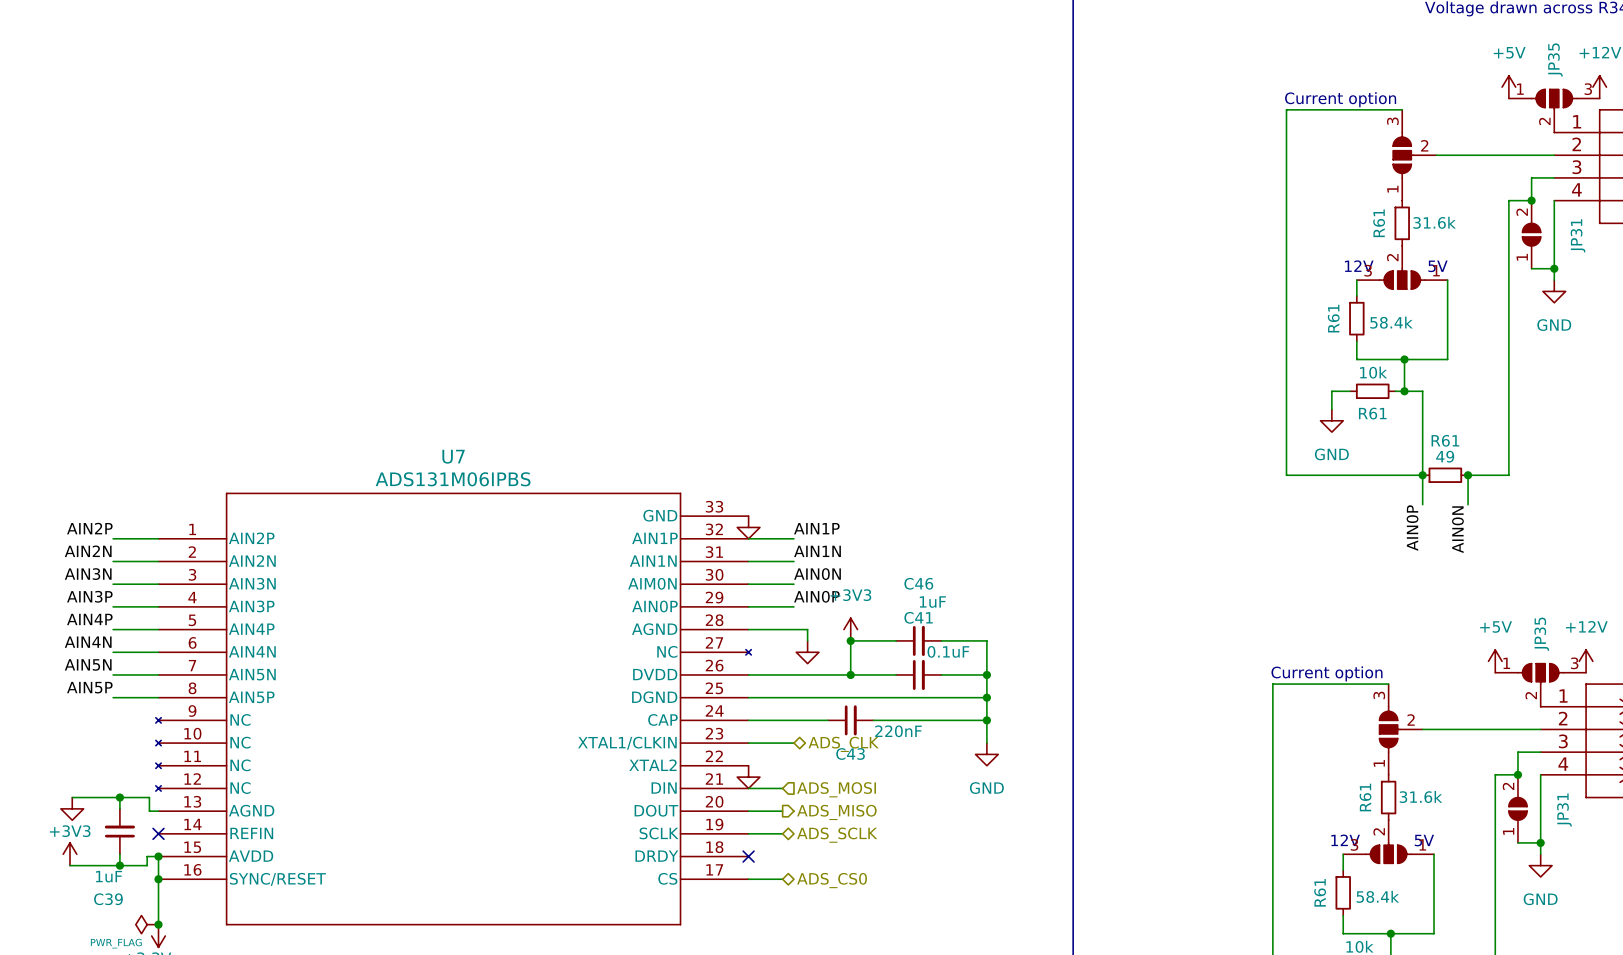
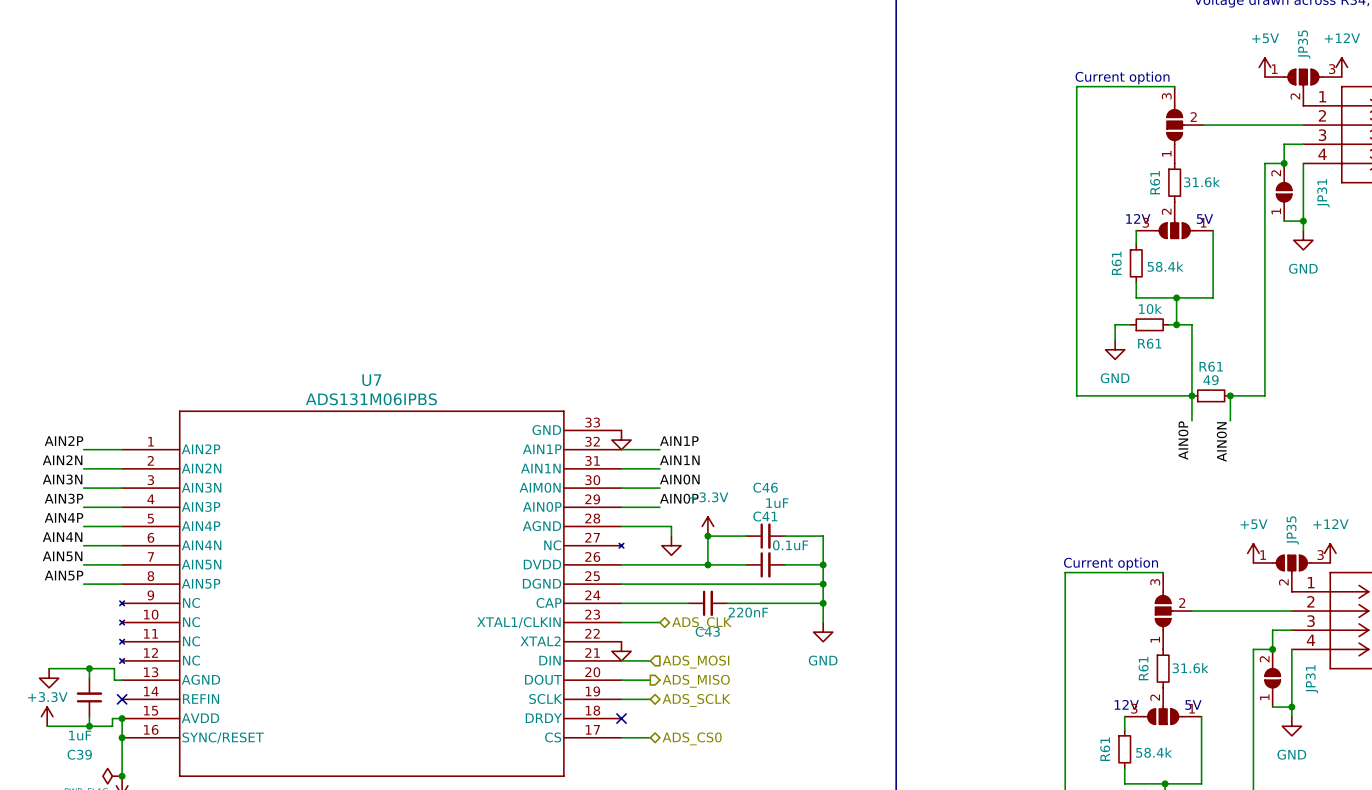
power symbol: +3V3 (850, 629) -> +3.3V (707, 526)
power symbol: +3V3 (69, 854) -> +3.3V (47, 716)

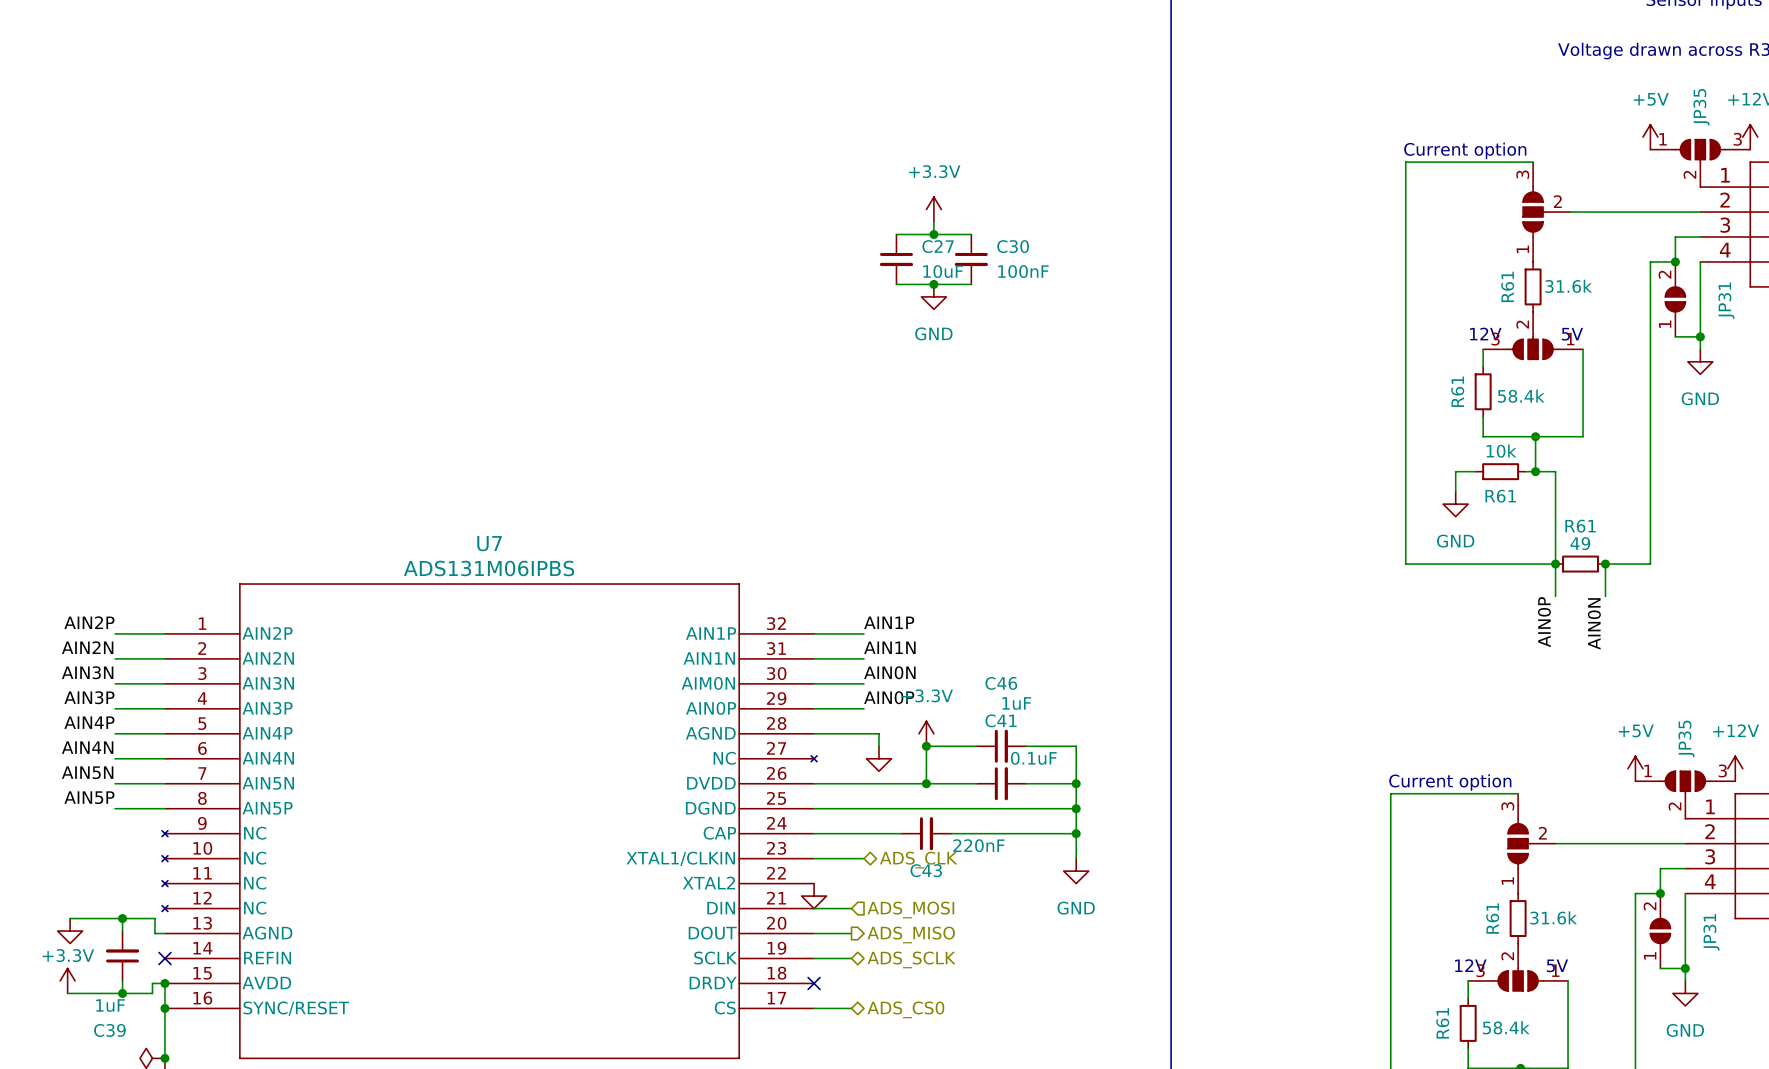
power symbol: none -> +3.3V (933, 209)
wire: none -> (933, 222) (933, 234)
wire: none -> (896, 234) (971, 234)
junction: none -> (933, 234)
C27: none -> 10uF (896, 259)
C30: none -> 100nF (971, 259)
wire: none -> (896, 284) (971, 284)
junction: none -> (933, 284)
power symbol: none -> GND (933, 296)
U7 symbol: [119, 410, 624, 777] -> [162, 583, 818, 1059]
power symbol: (621, 440) -> none

